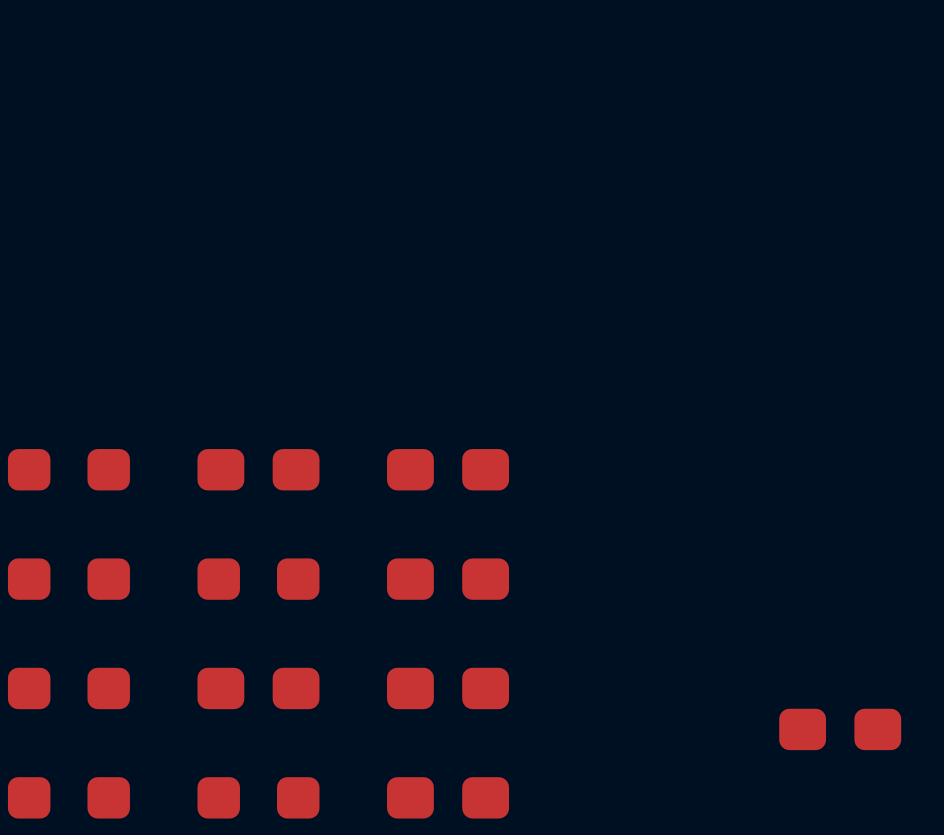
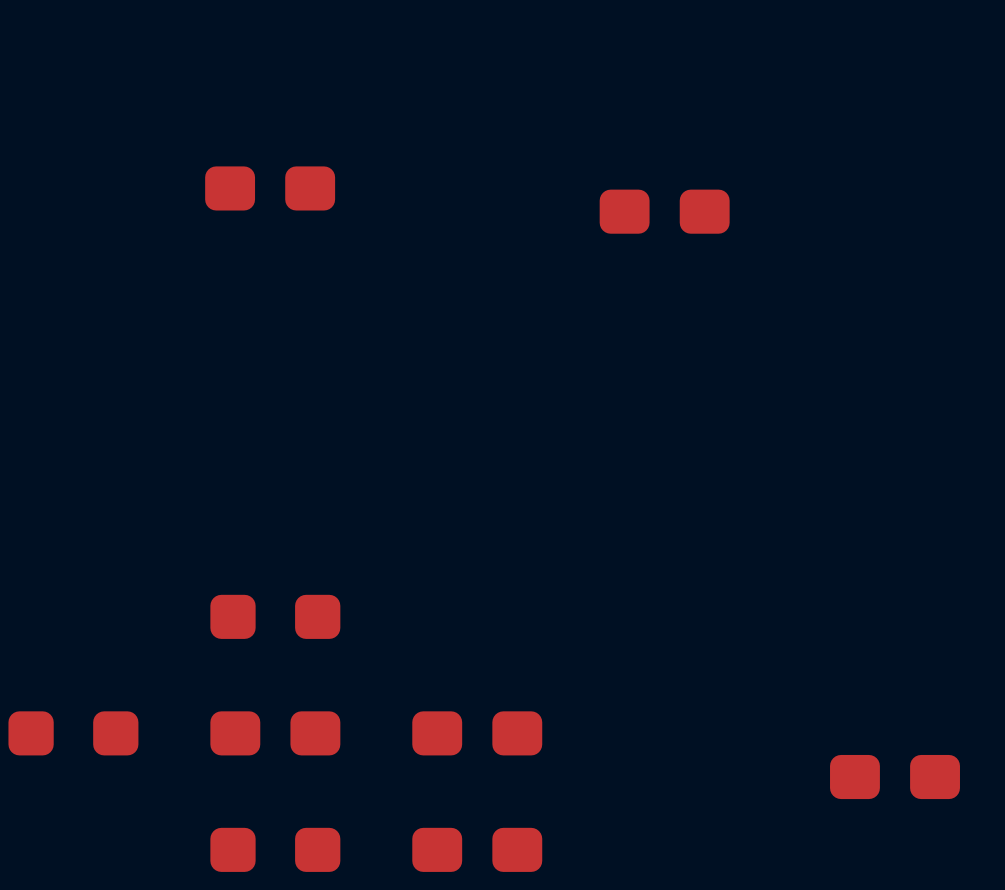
part: none -> (270, 188)
part: none -> (664, 211)
part: (68, 469) -> none
part: (258, 469) -> none
part: (448, 469) -> none
part: (68, 579) -> none
part: (448, 579) -> none
part: (68, 797) -> none

